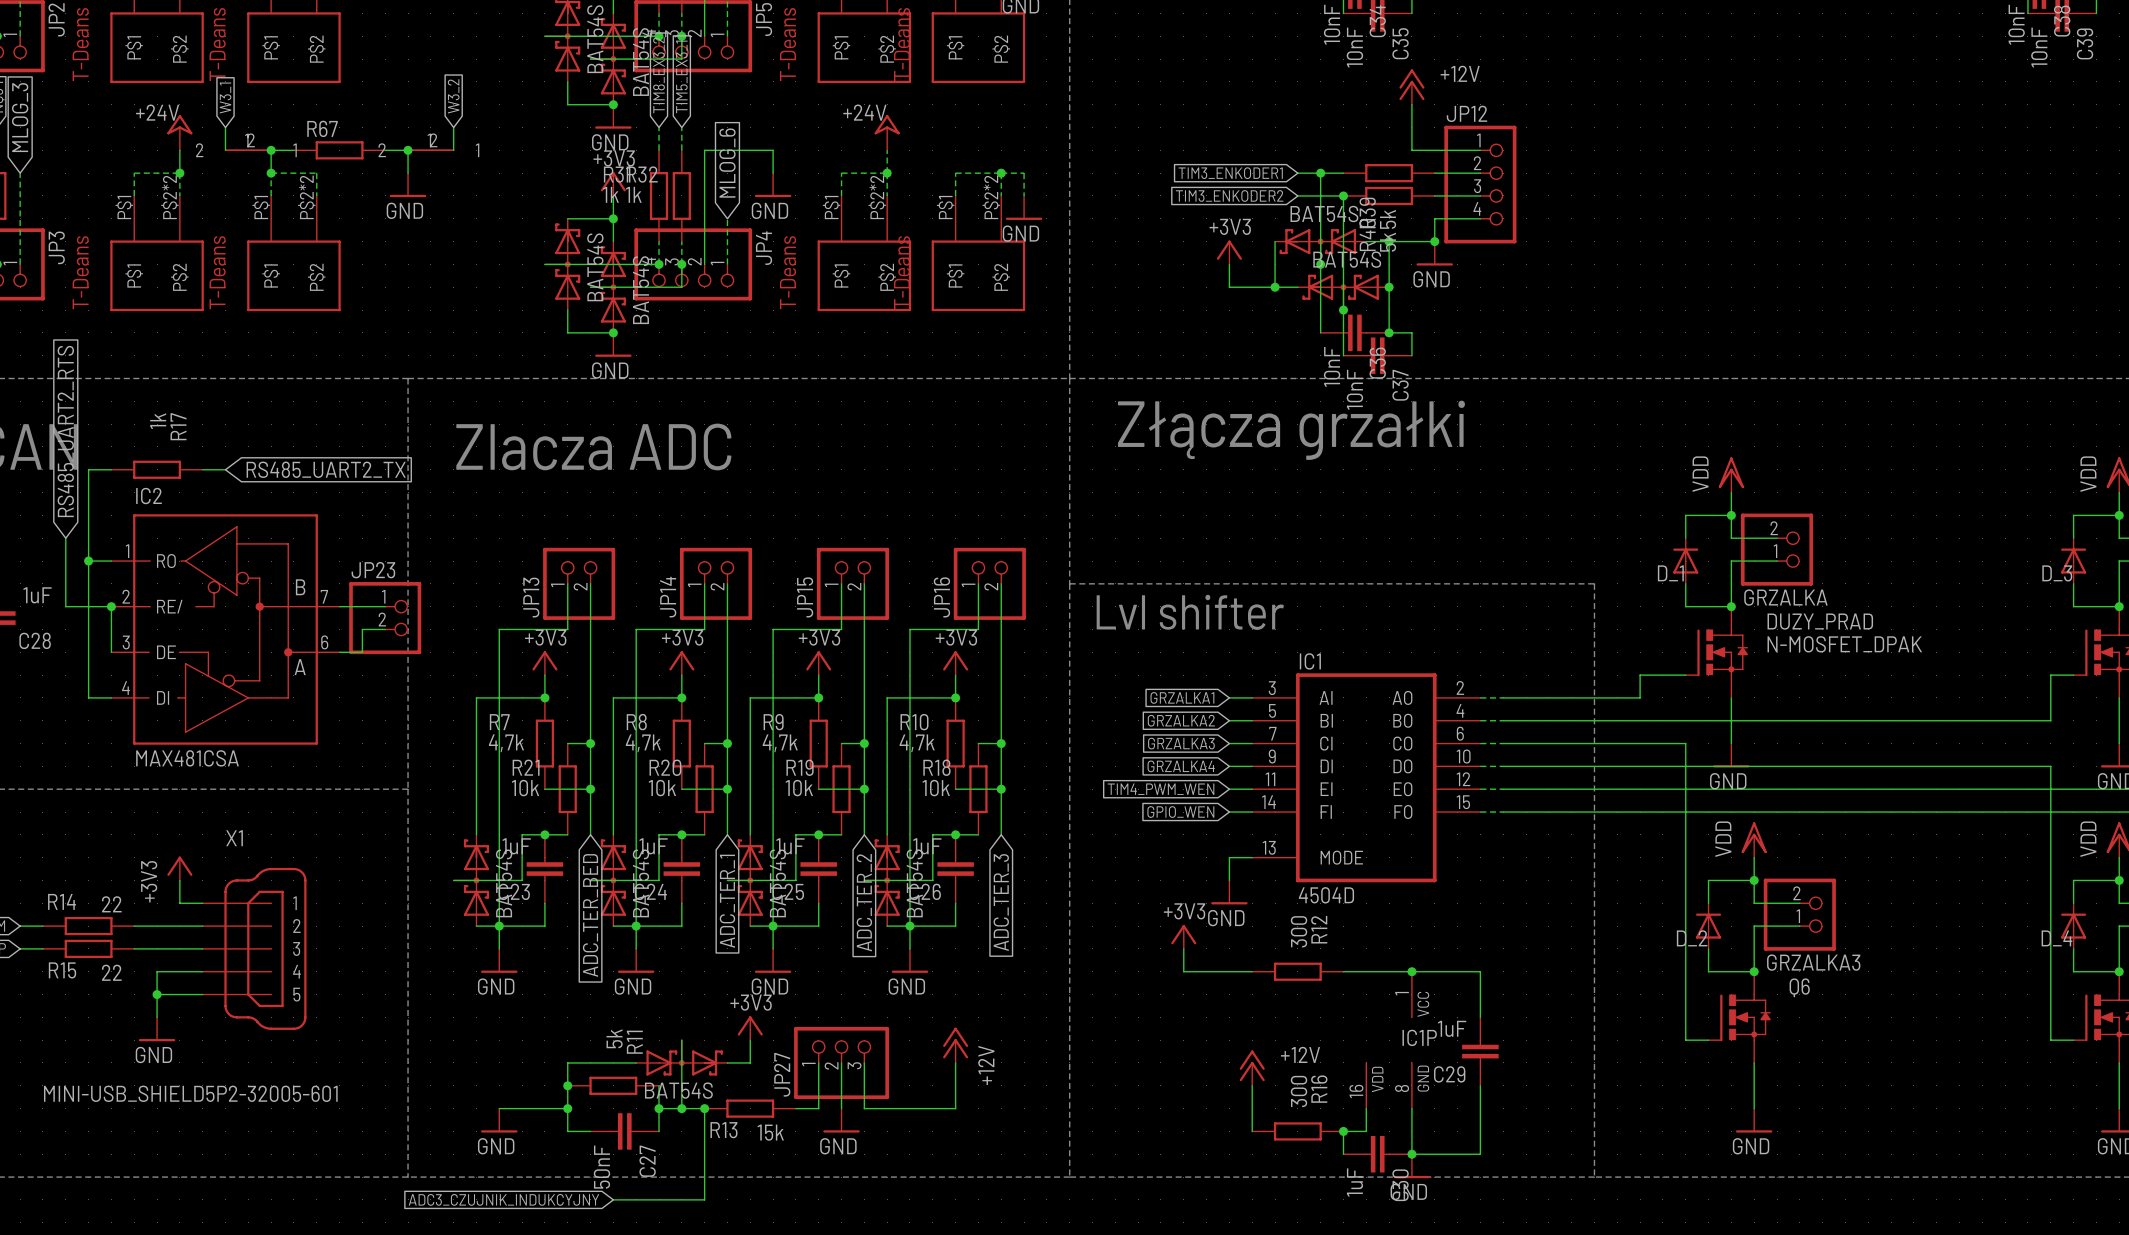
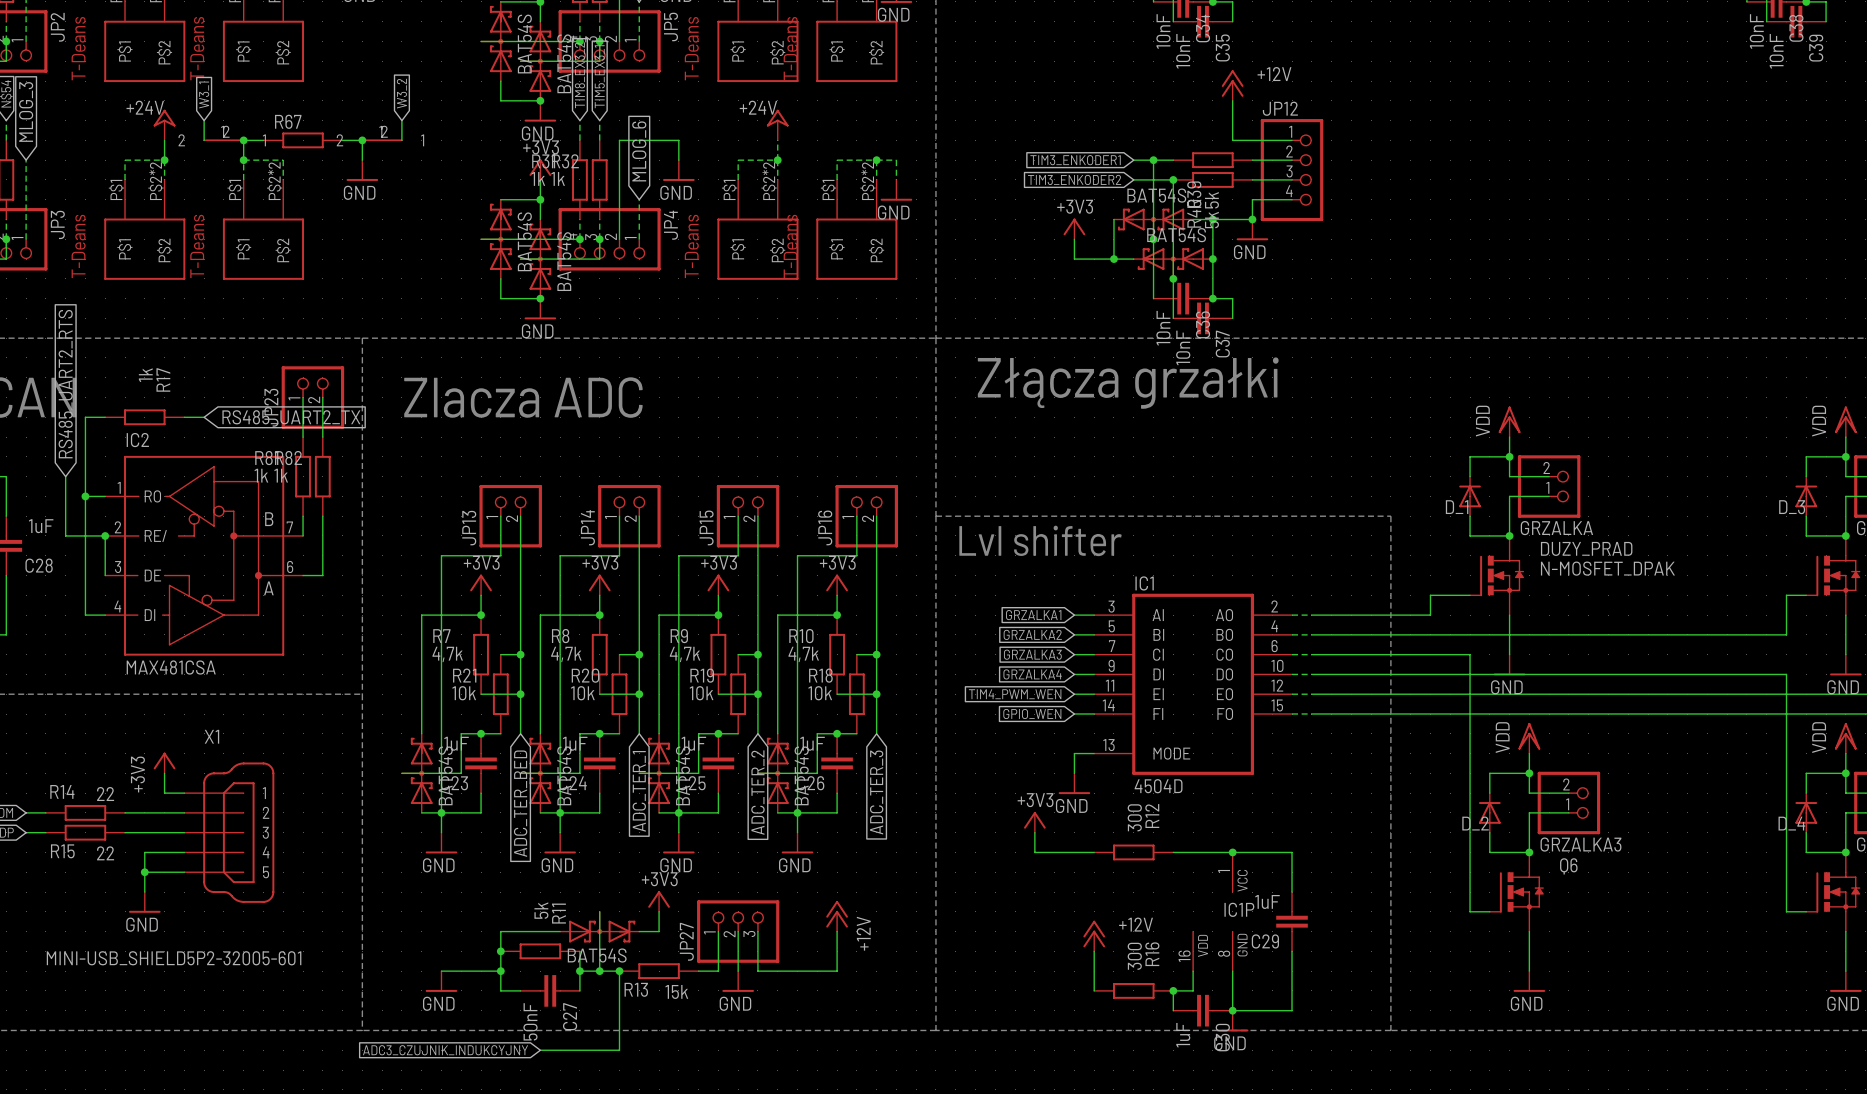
wire: none -> (303, 397) (303, 437)
wire: none -> (322, 397) (322, 437)
R81: none -> 1k (303, 476)
R82: none -> 1k (322, 476)
wire: (339, 606) (385, 606) -> (303, 535) (303, 516)
JP23 rotation: 0° (385, 618) -> 90° counterclockwise (312, 397)
JP23 position: (385, 618) -> (312, 397)
wire: (362, 629) (385, 629) -> (322, 555) (322, 516)

